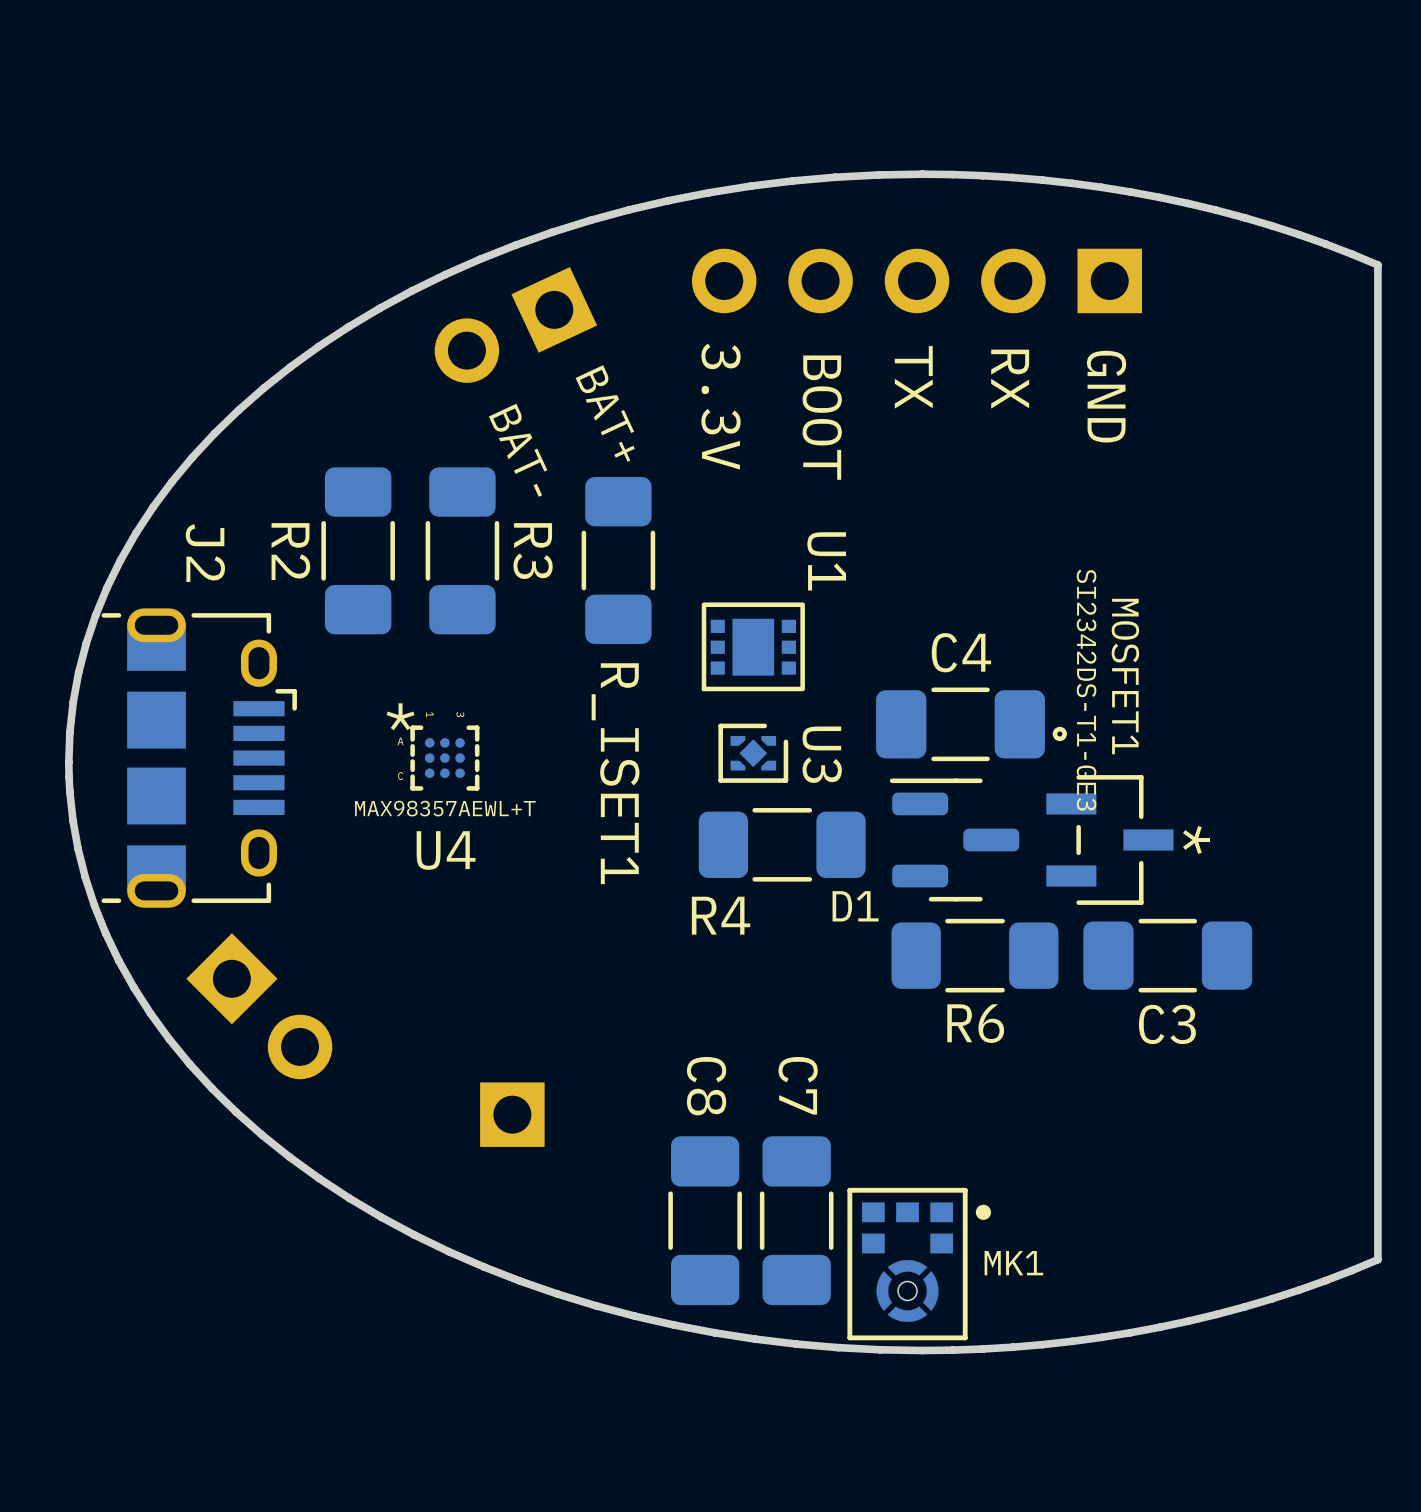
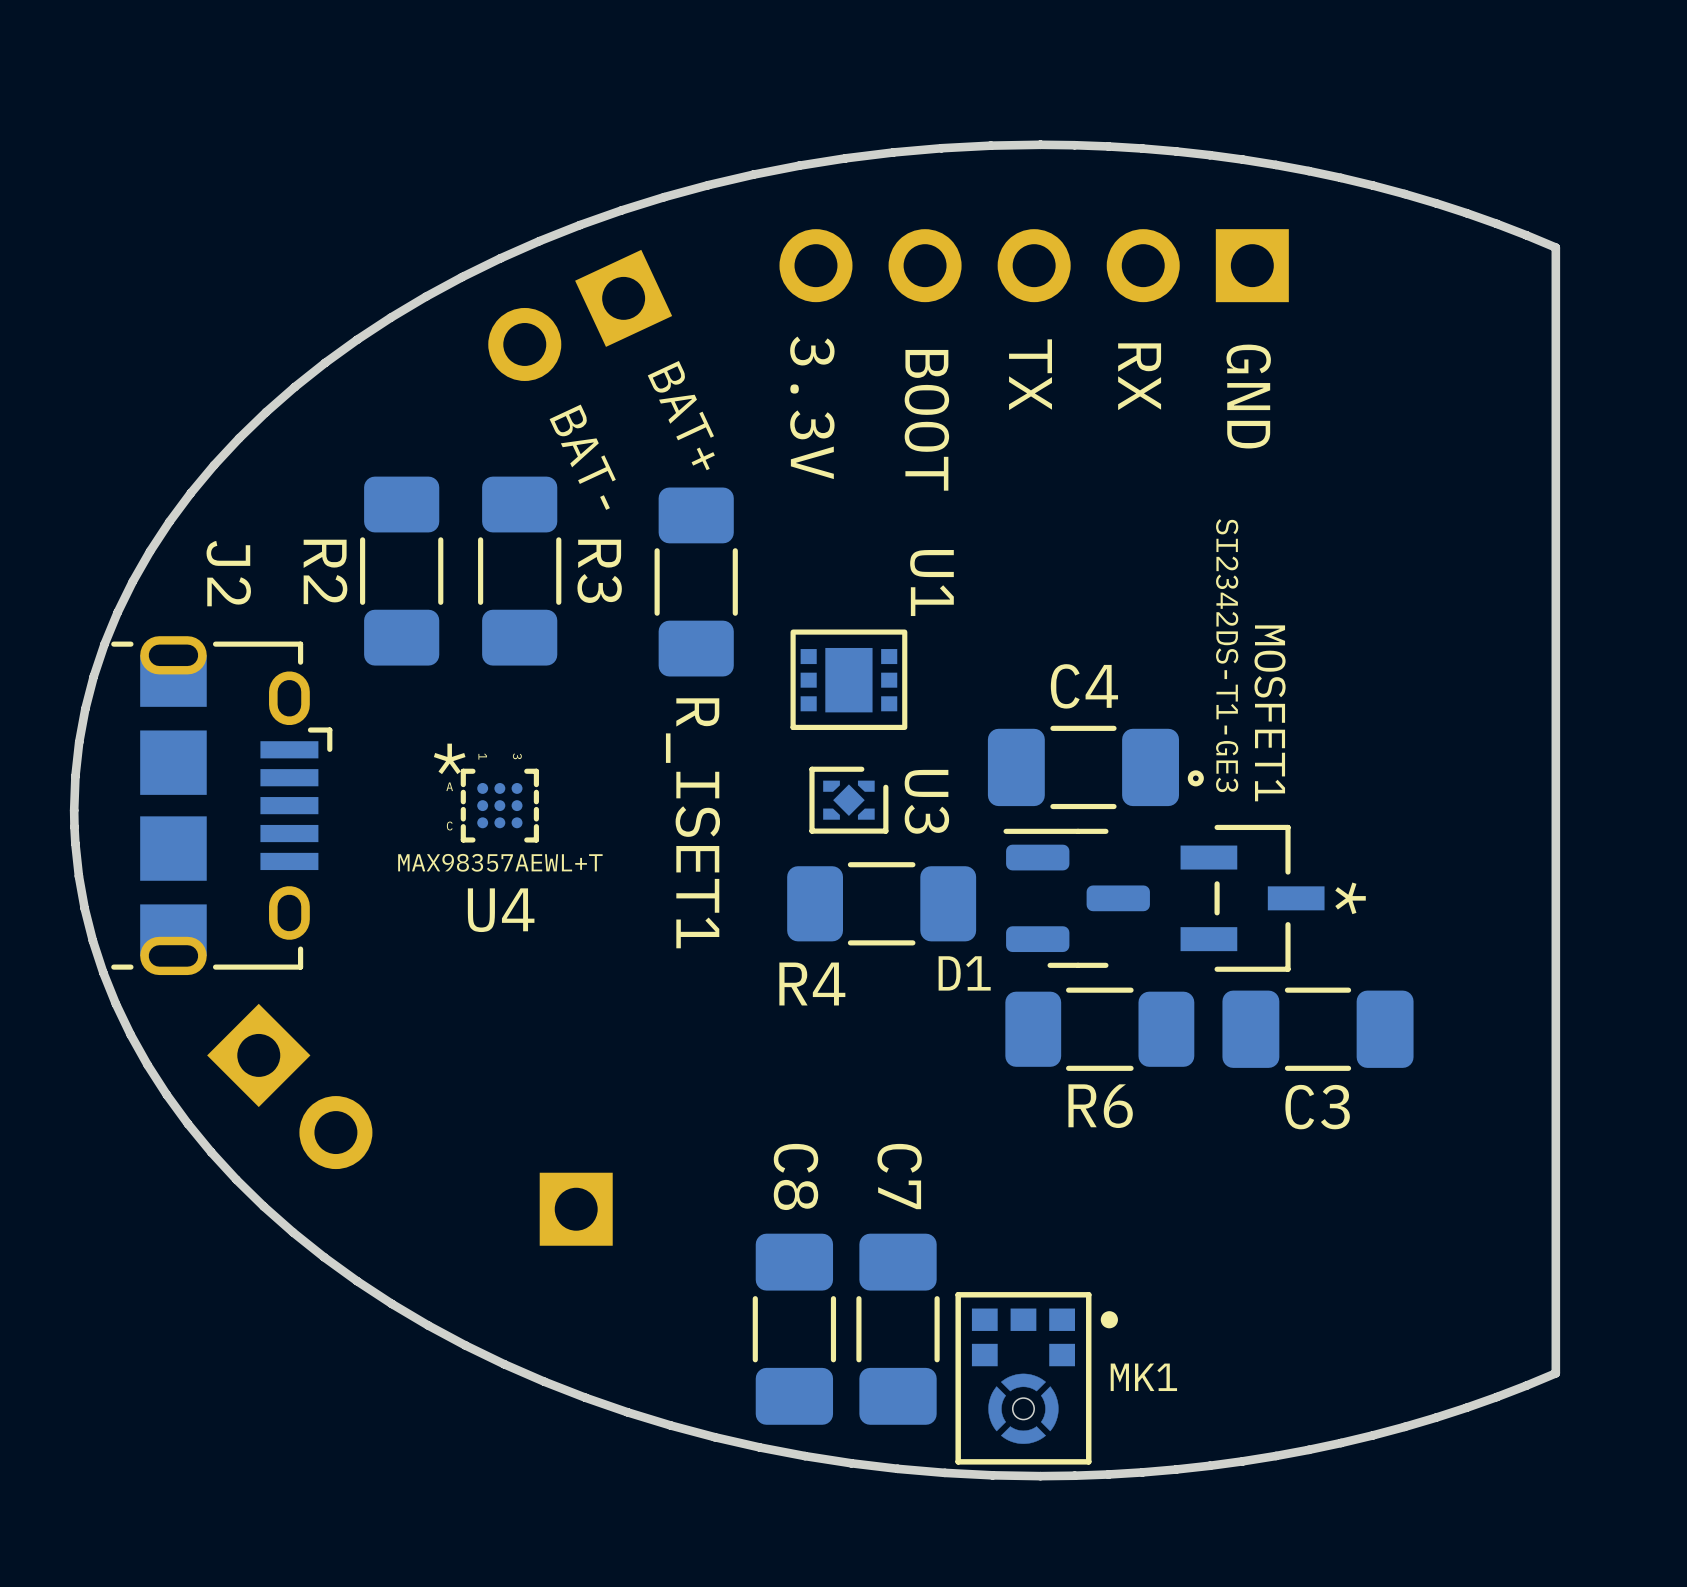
MOSFET1 value position: SI2342DS-T1-GE3 (1086, 690) -> SI2342DS-T1-GE3 (1227, 655)

